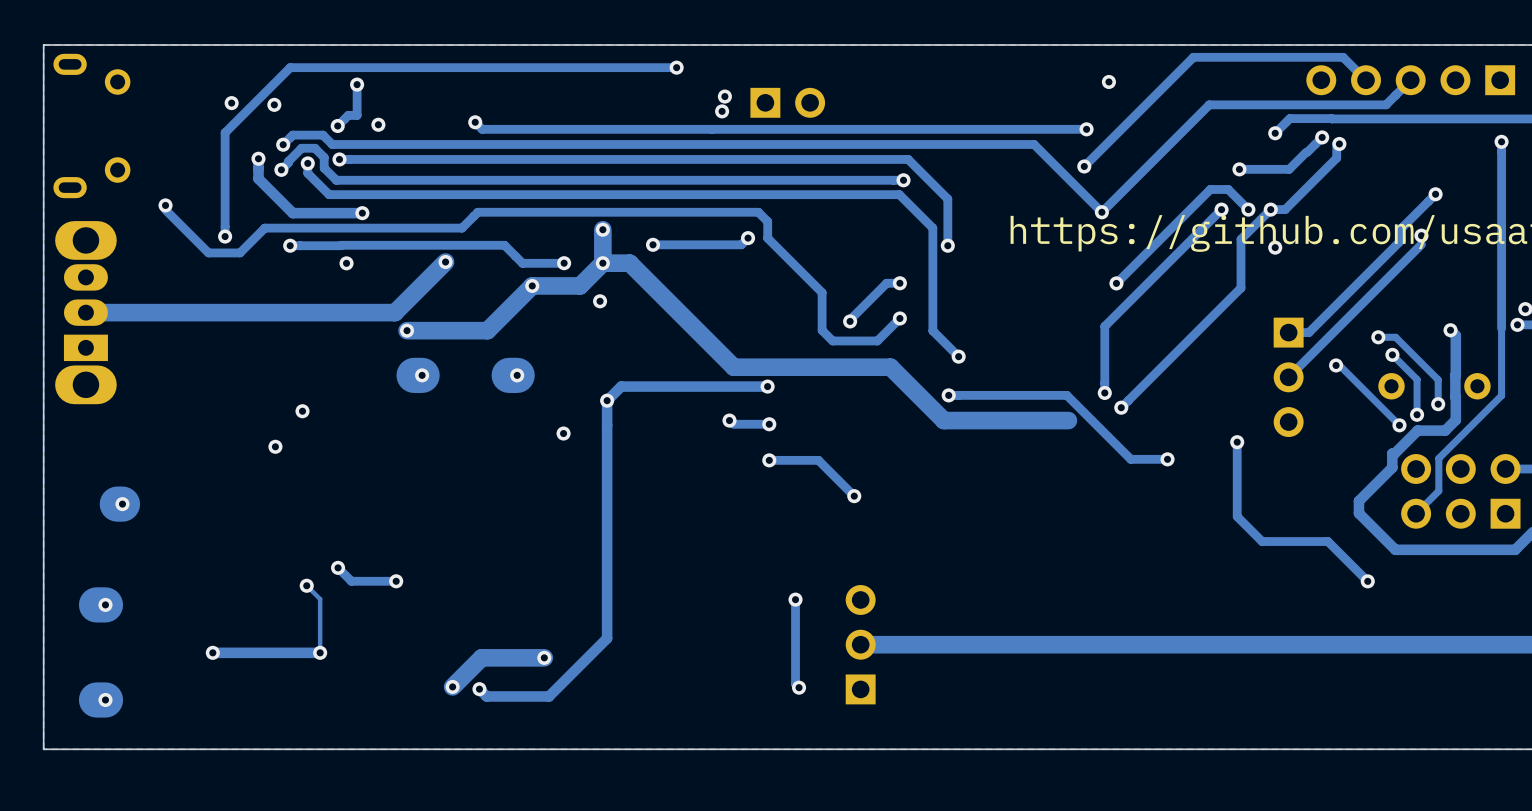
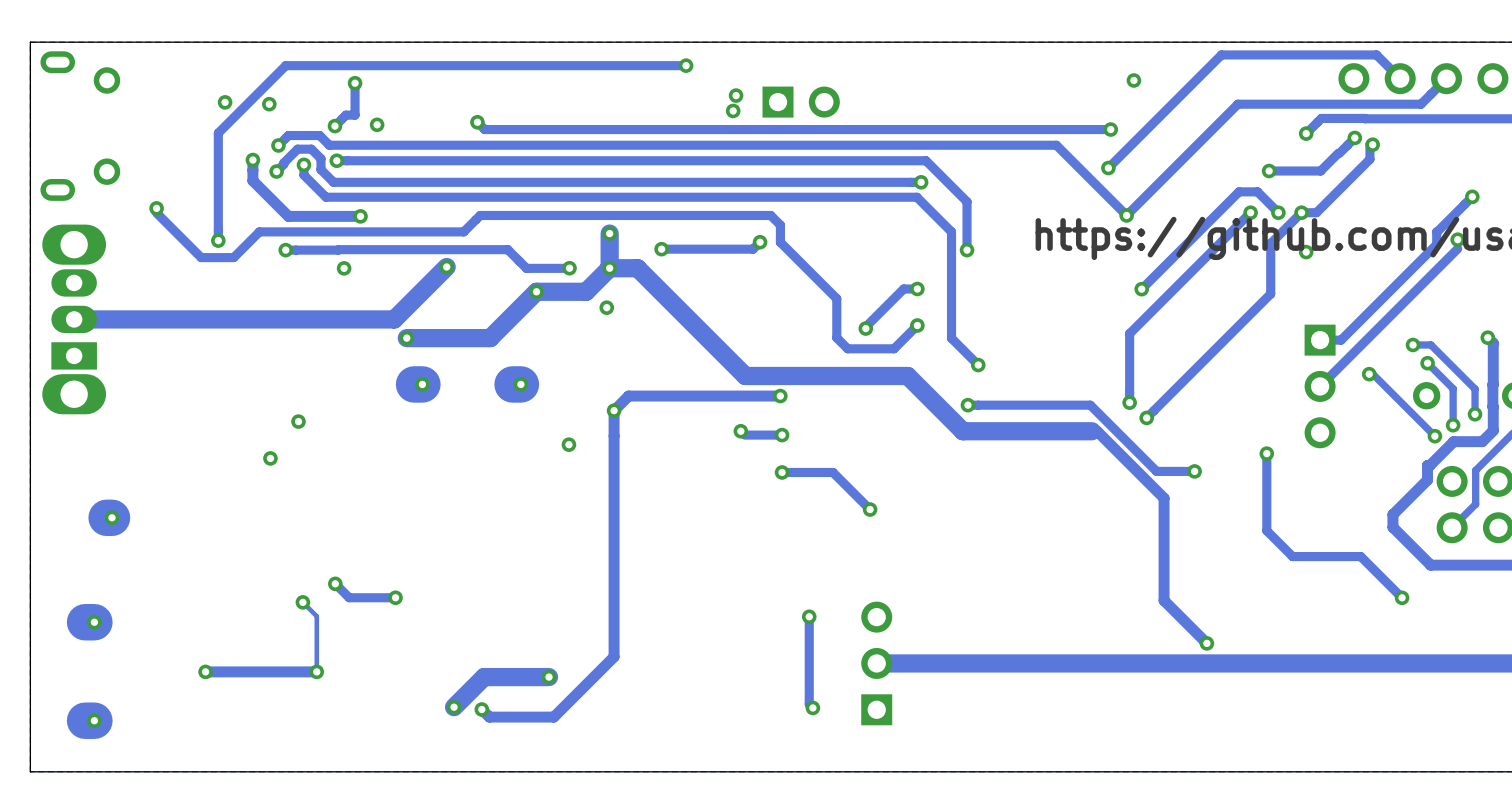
track: none -> (1091, 431) (1097, 431) (1164, 498) (1164, 600) (1206, 643)
via: none -> (1206, 643)

